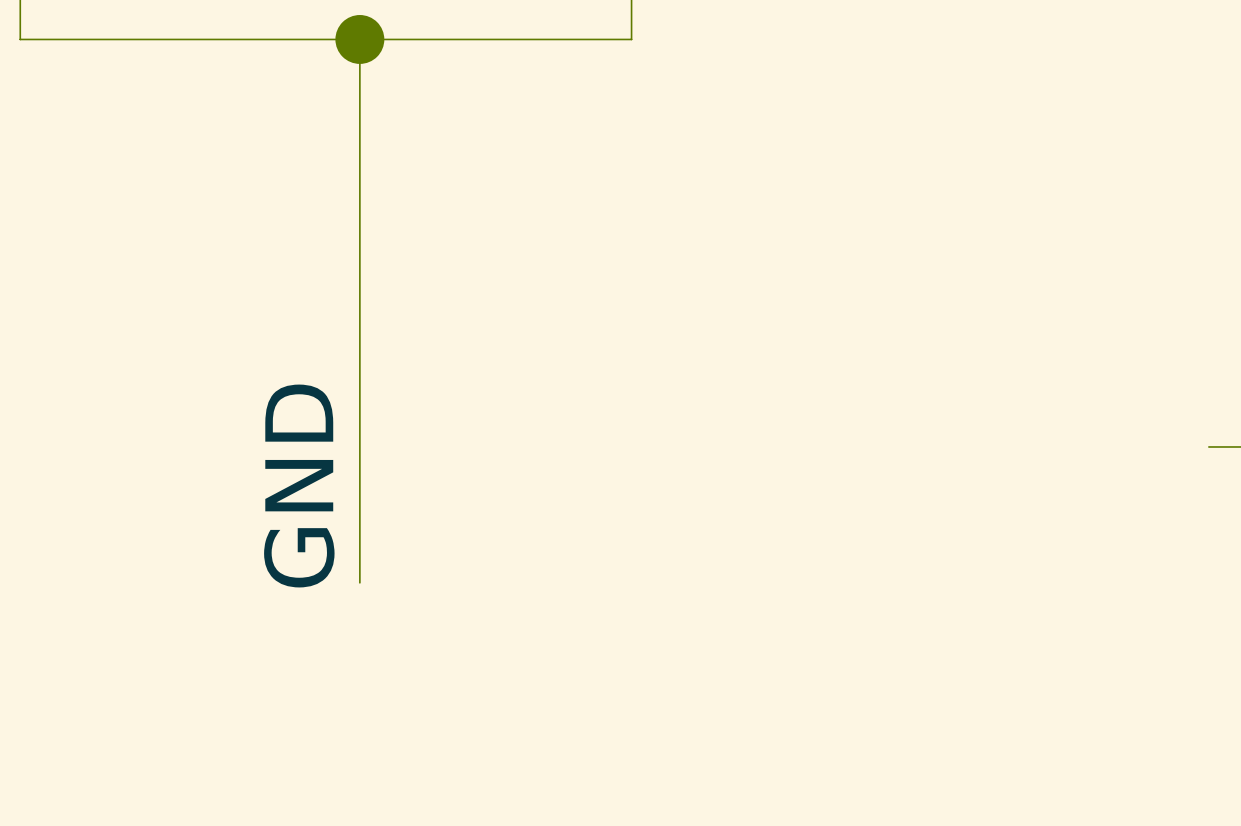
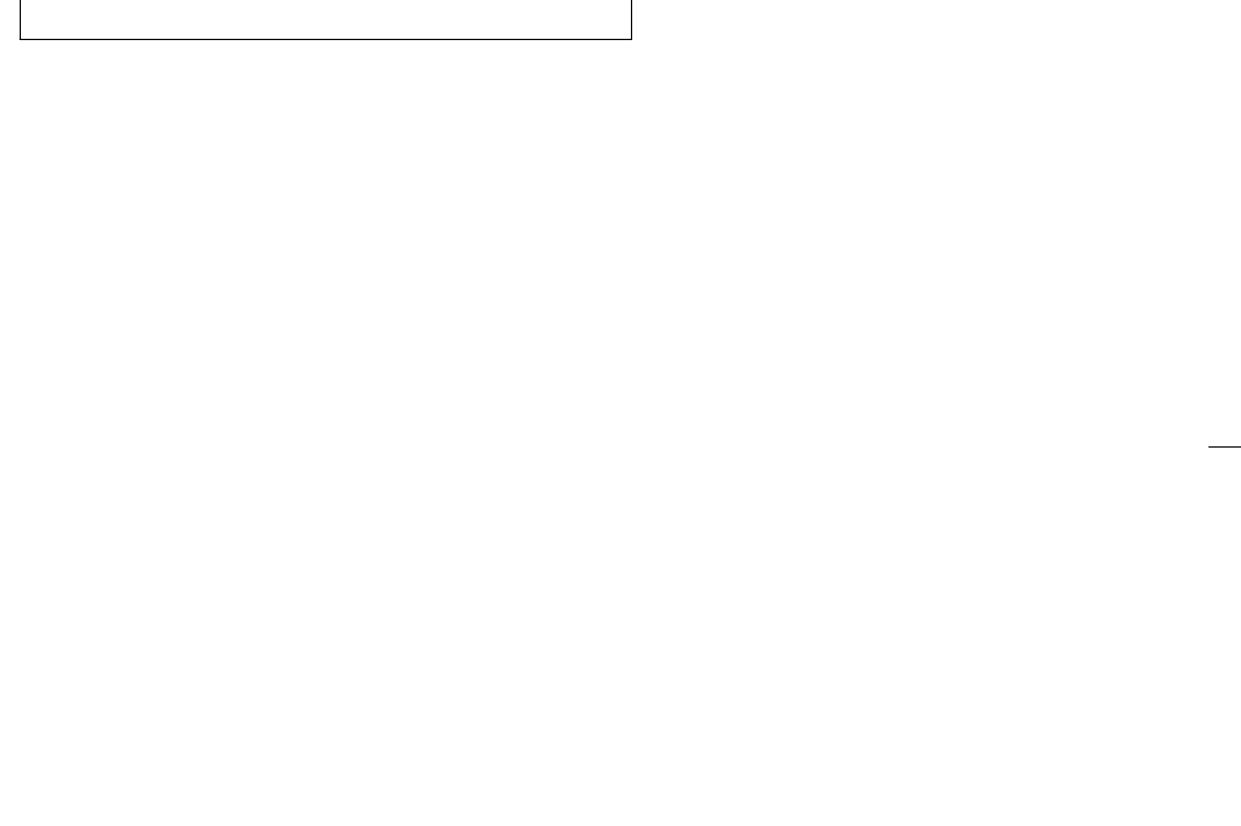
wire: (359, 39) (359, 582) -> none
junction: (359, 39) -> none
label: GND (299, 486) -> none

